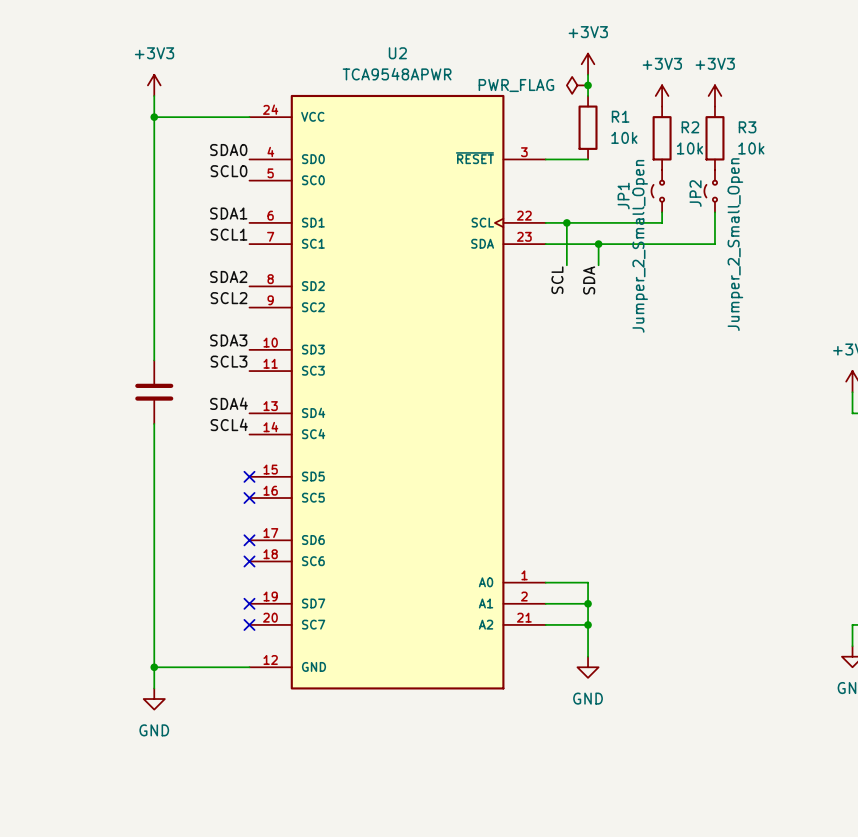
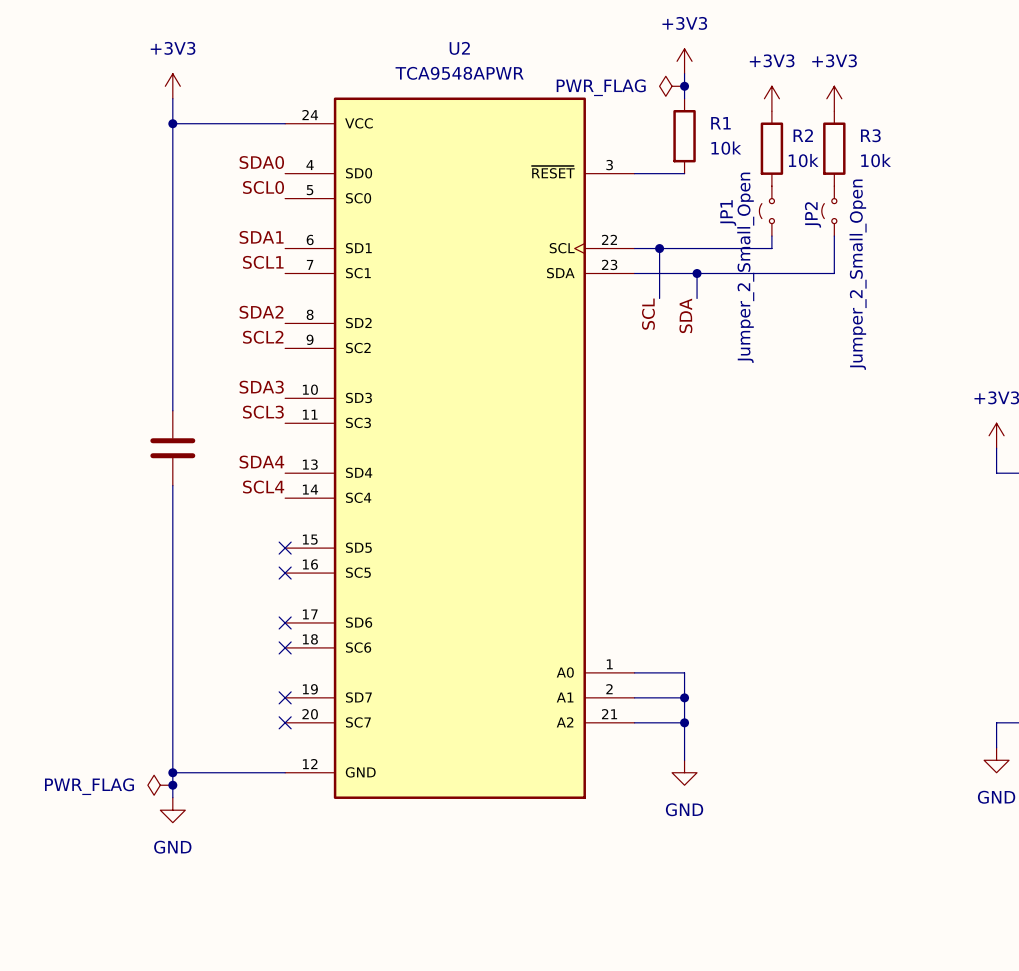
power symbol: none -> PWR_FLAG (160, 785)
junction: none -> (172, 785)

